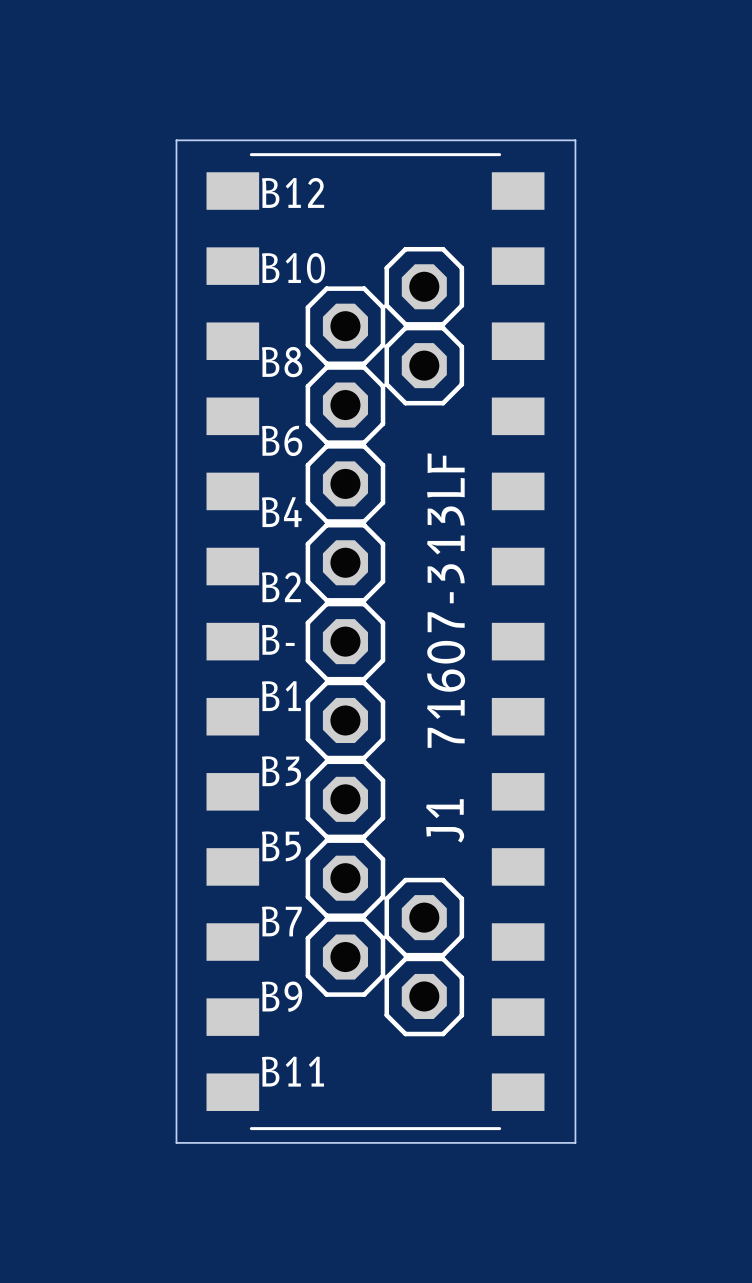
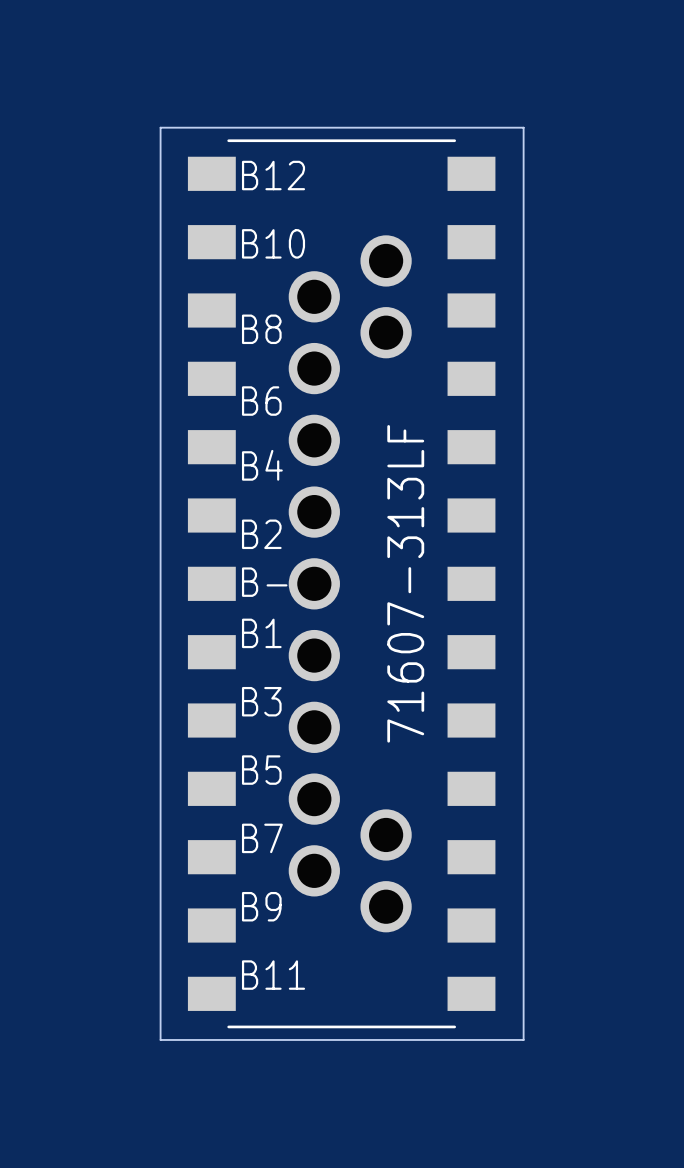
part footprint: [384, 246, 465, 327] -> [360, 235, 412, 287]
part footprint: [305, 286, 386, 367] -> [288, 271, 340, 323]
part footprint: [384, 325, 465, 406] -> [360, 307, 412, 359]
part footprint: [305, 365, 386, 445] -> [288, 342, 340, 395]
part footprint: [305, 444, 386, 524] -> [288, 414, 340, 466]
part footprint: [305, 522, 386, 603] -> [288, 486, 340, 538]
J1 value position: 71607-313LF (446, 600) -> 71607-313LF (405, 583)
part footprint: [305, 601, 386, 682] -> [288, 558, 340, 610]
part footprint: [305, 680, 386, 761] -> [288, 629, 340, 682]
part footprint: [305, 759, 386, 840] -> [288, 701, 340, 753]
J1 name: J1 (445, 820) -> none
part footprint: [305, 838, 386, 918] -> [288, 773, 340, 825]
part footprint: [384, 877, 465, 958] -> [360, 809, 412, 861]
part footprint: [305, 917, 386, 997] -> [288, 845, 340, 897]
part footprint: [384, 956, 465, 1037] -> [360, 881, 412, 933]

